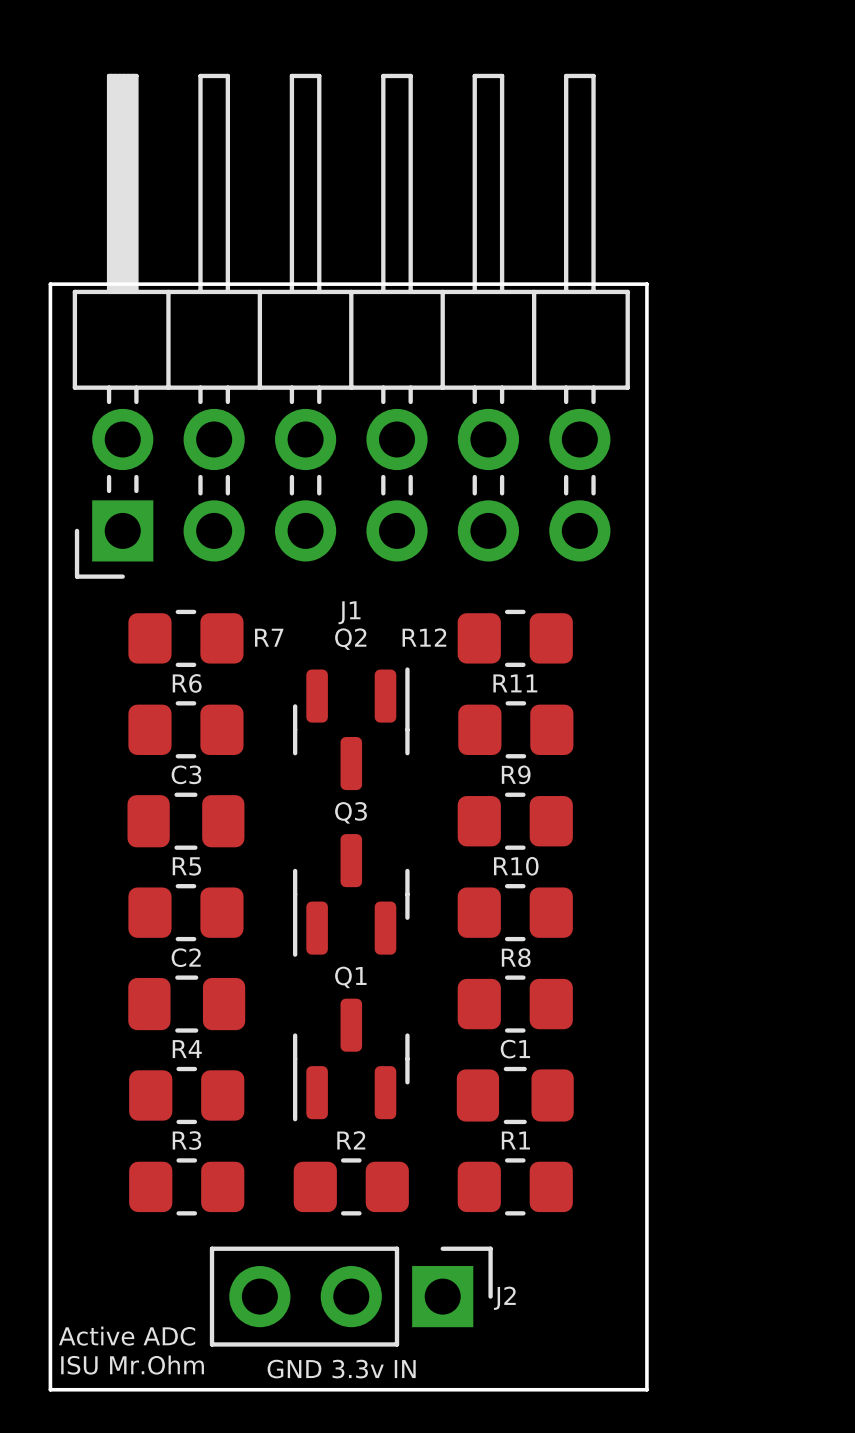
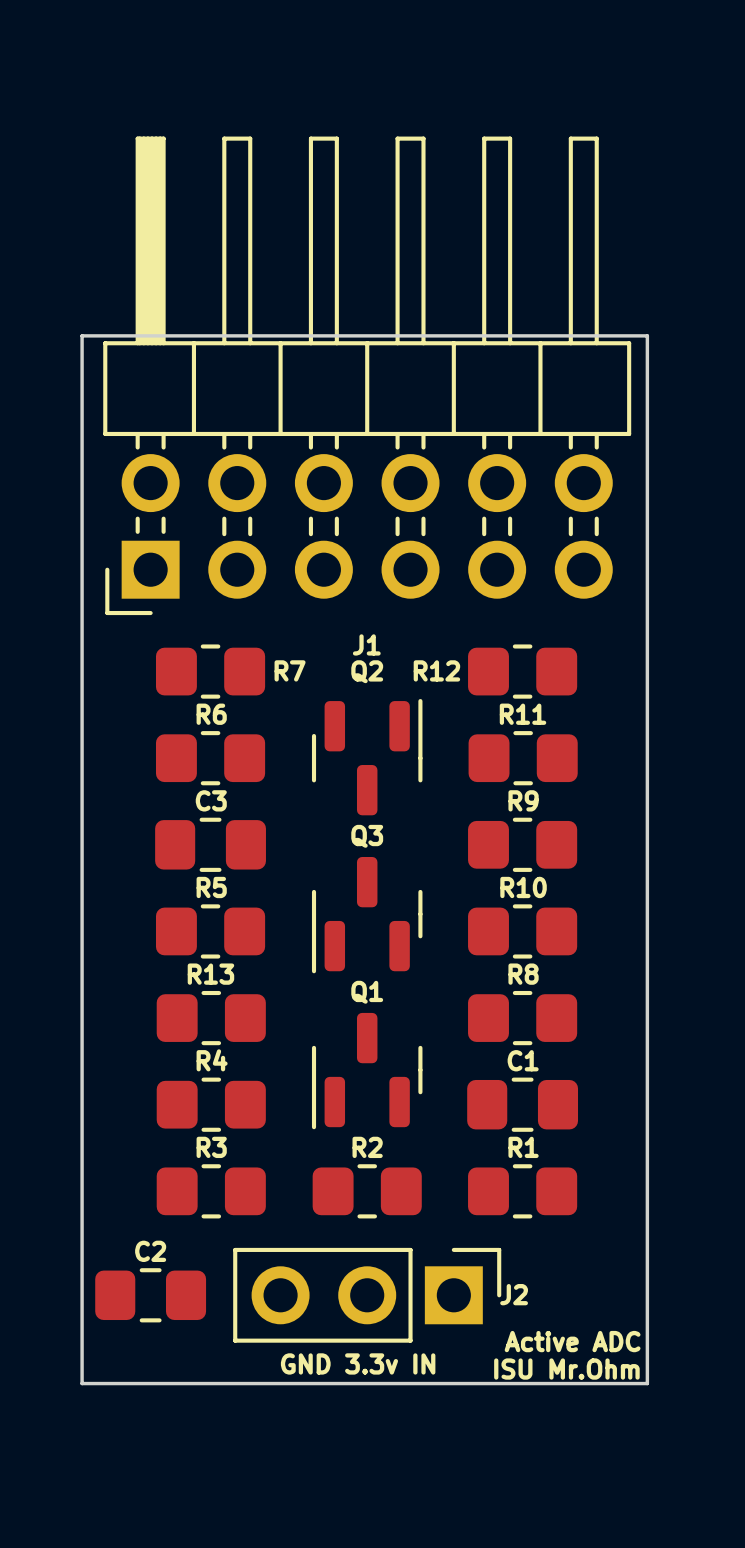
C2 position: (186, 1004) -> (150, 1295)
R13: none -> (211, 1018)
text position: Active ADC (127, 1336) -> Active ADC (572, 1341)
text position: ISU Mr.Ohm (132, 1365) -> ISU Mr.Ohm (566, 1369)

